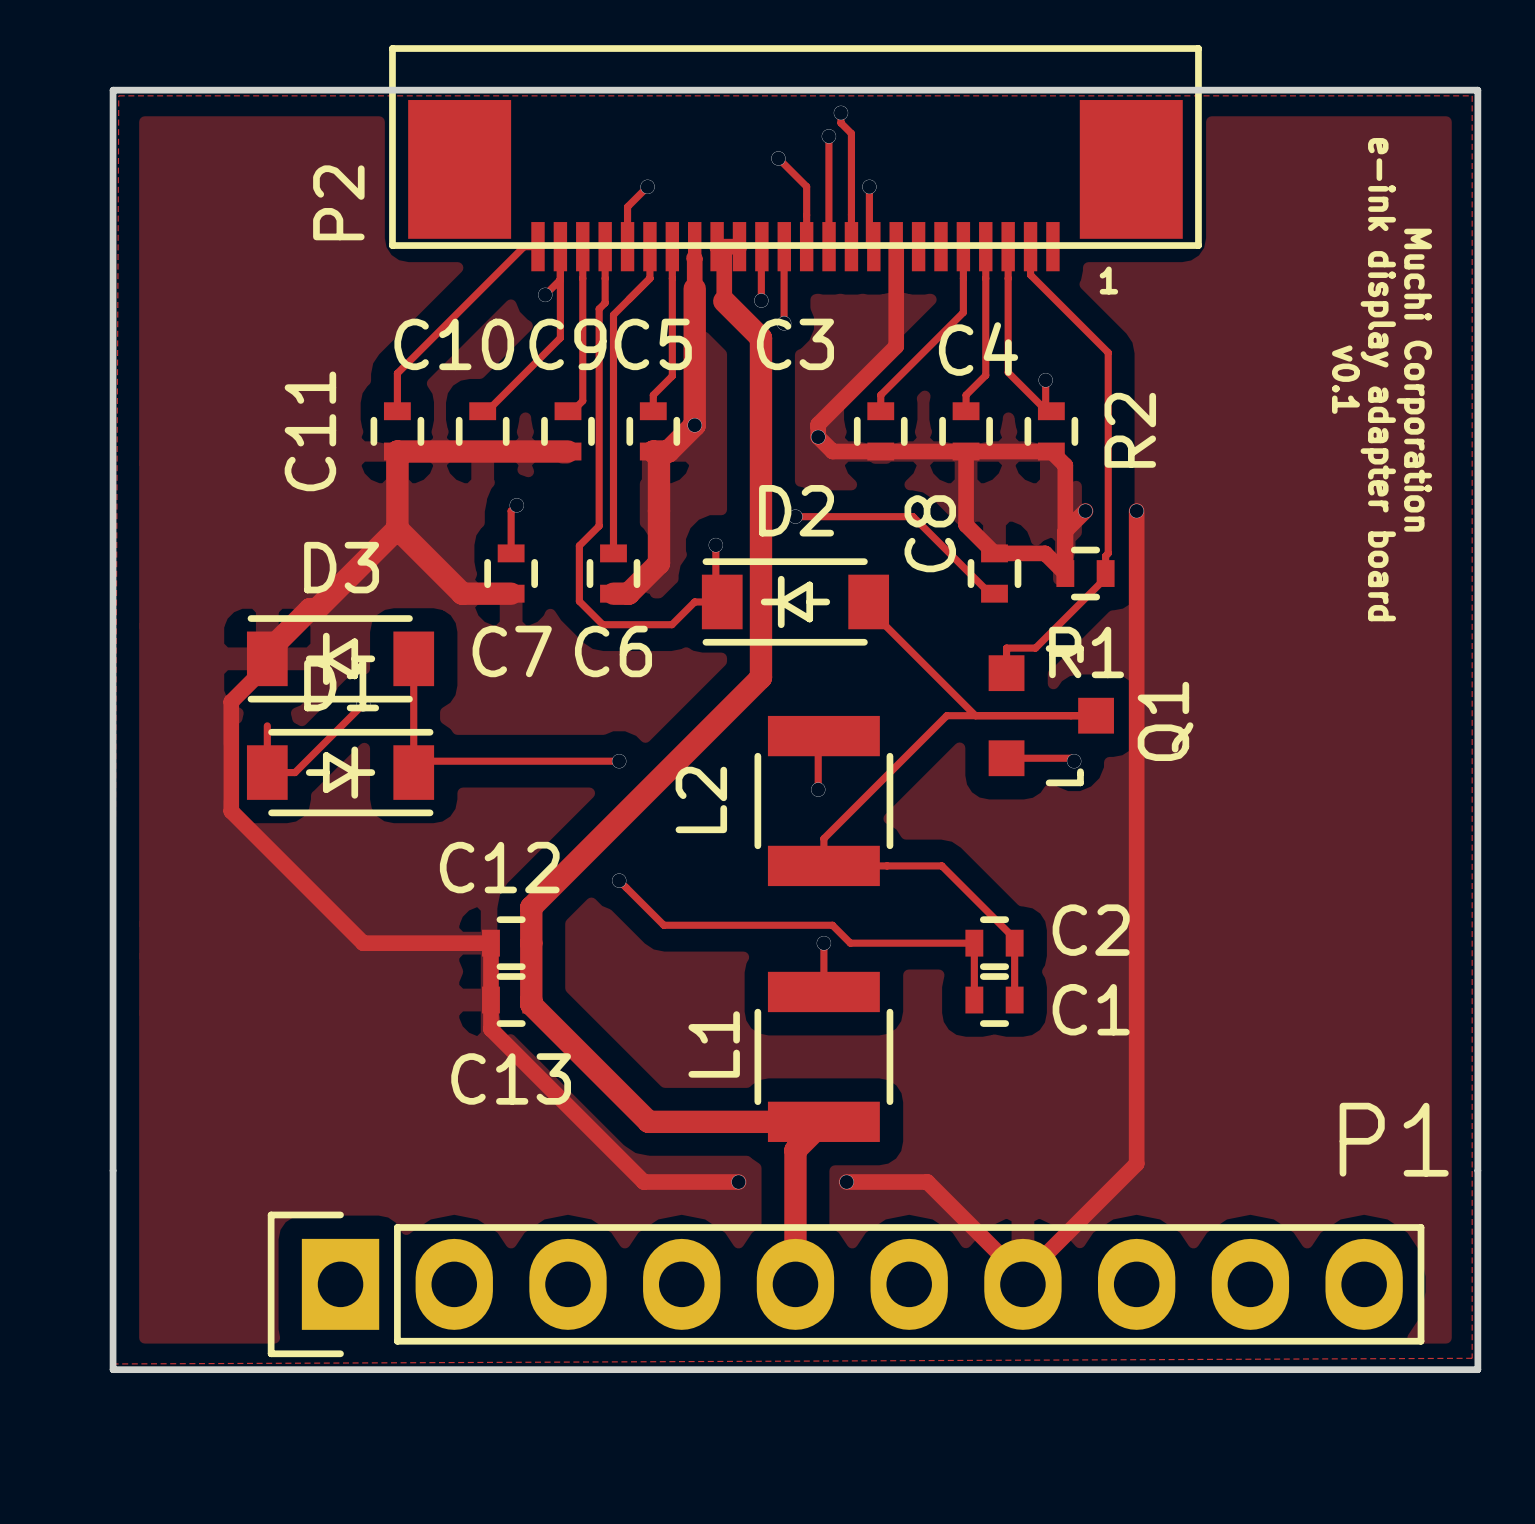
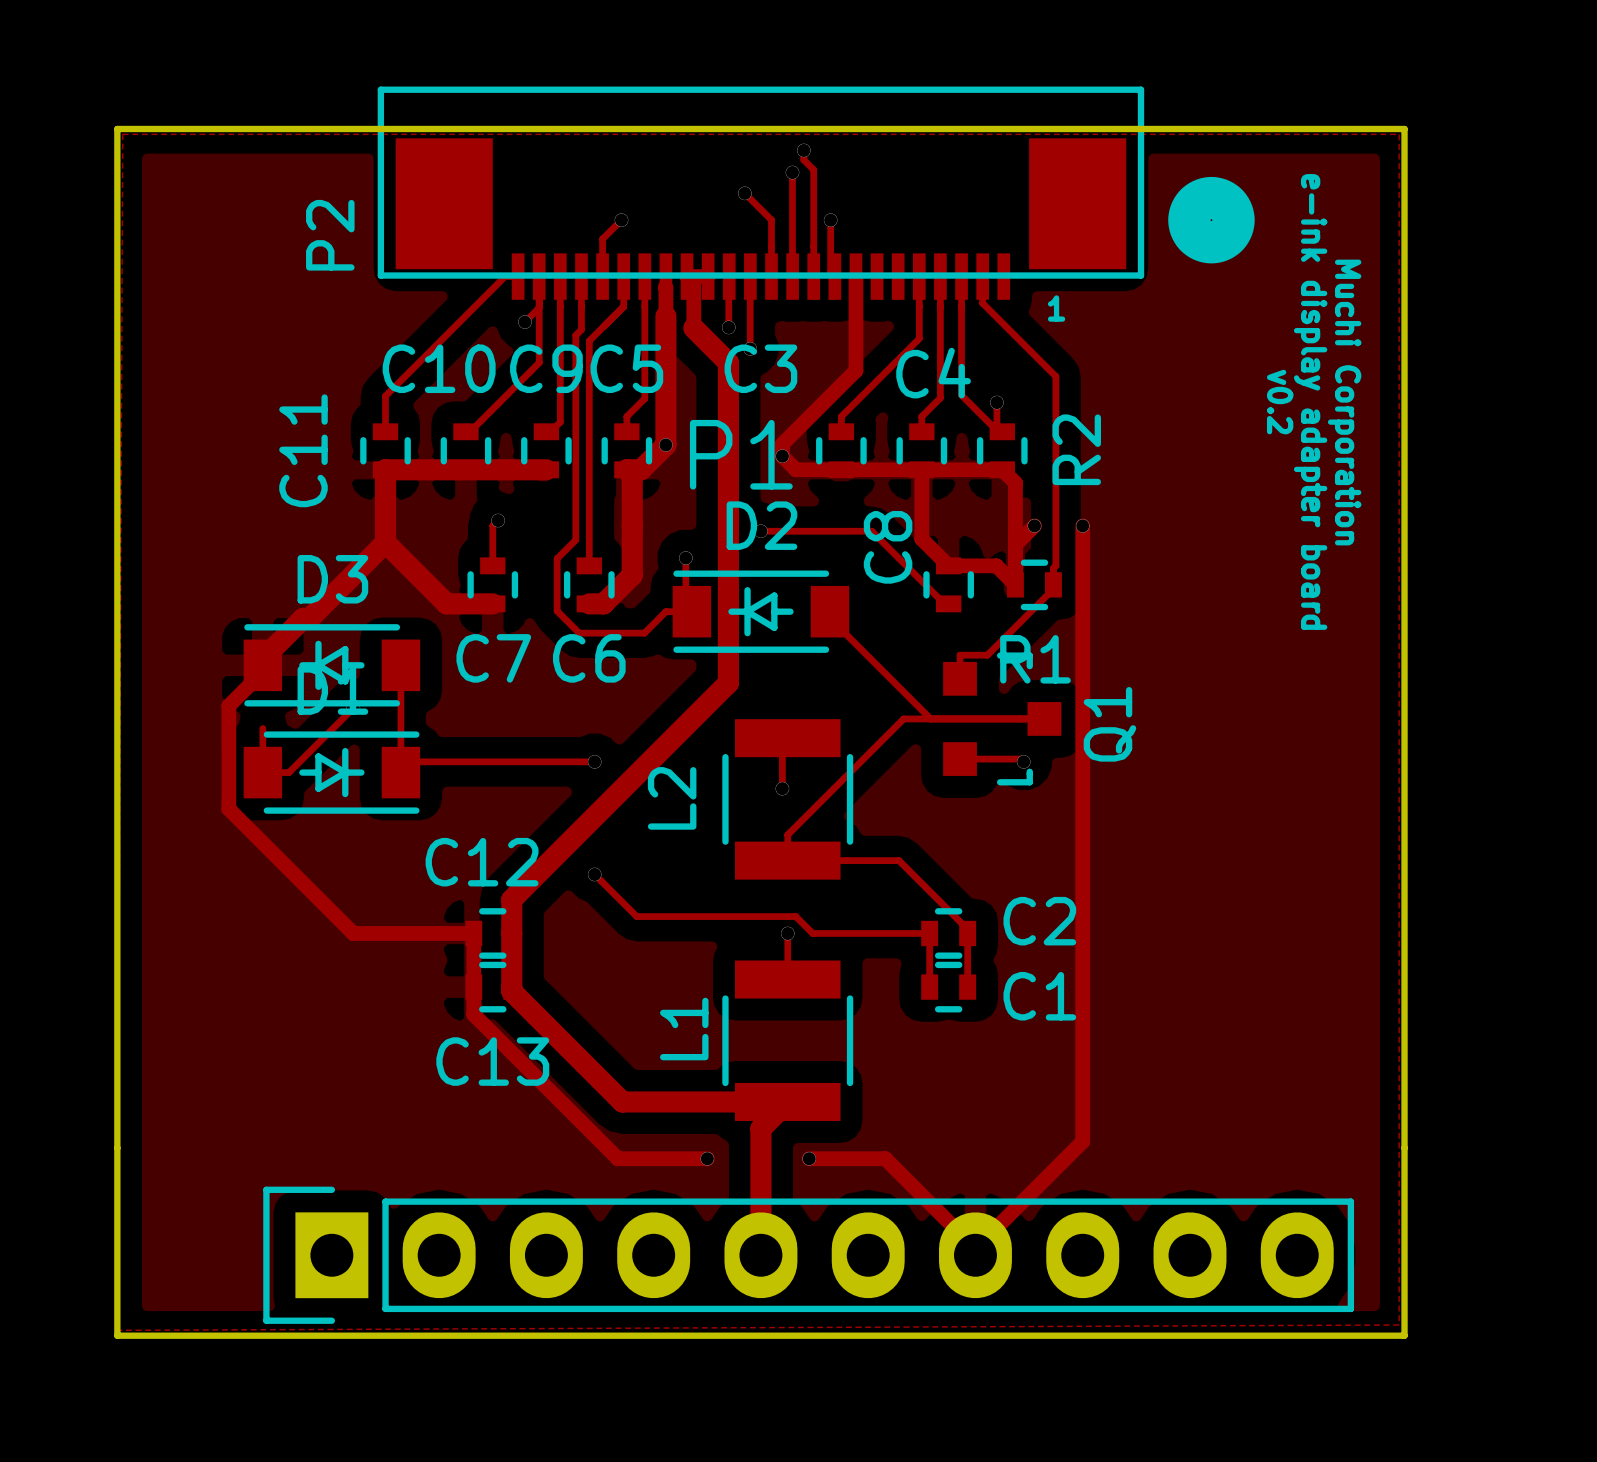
drawing: none -> [1168, 176, 1255, 264]
text: v0.1 (1345, 379) -> v0.2 (1280, 402)
P1 name position: P1 (1394, 1139) -> P1 (741, 454)

